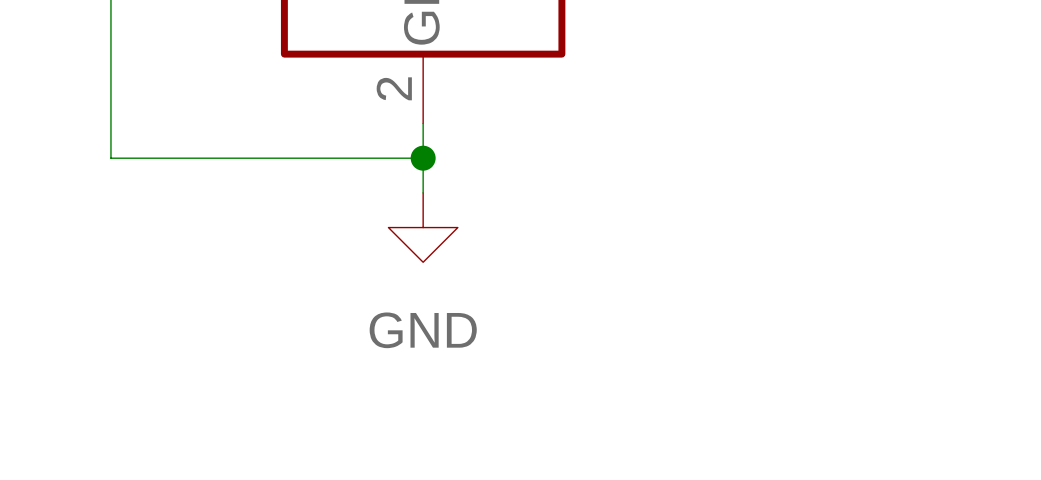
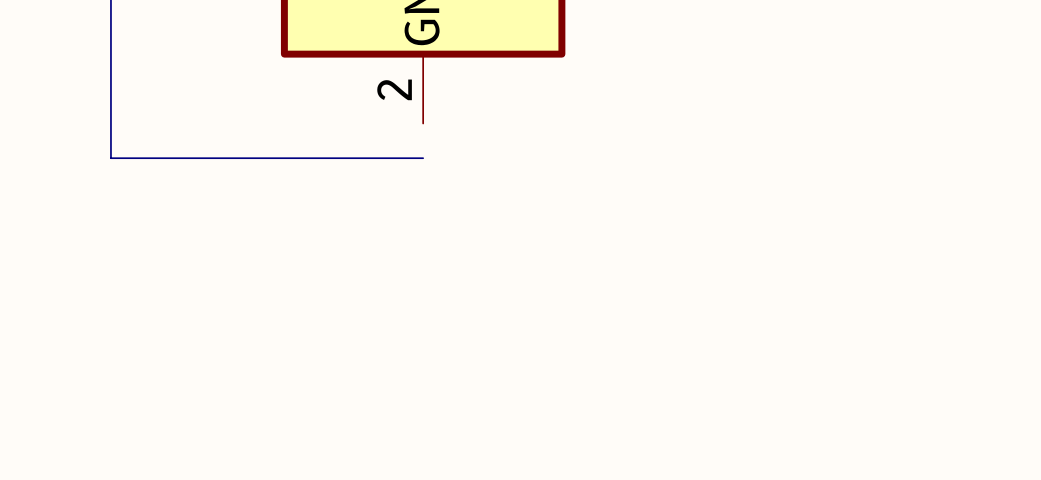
wire: (423, 123) (423, 192) -> none
junction: (423, 158) -> none
power symbol: GND (423, 227) -> none

